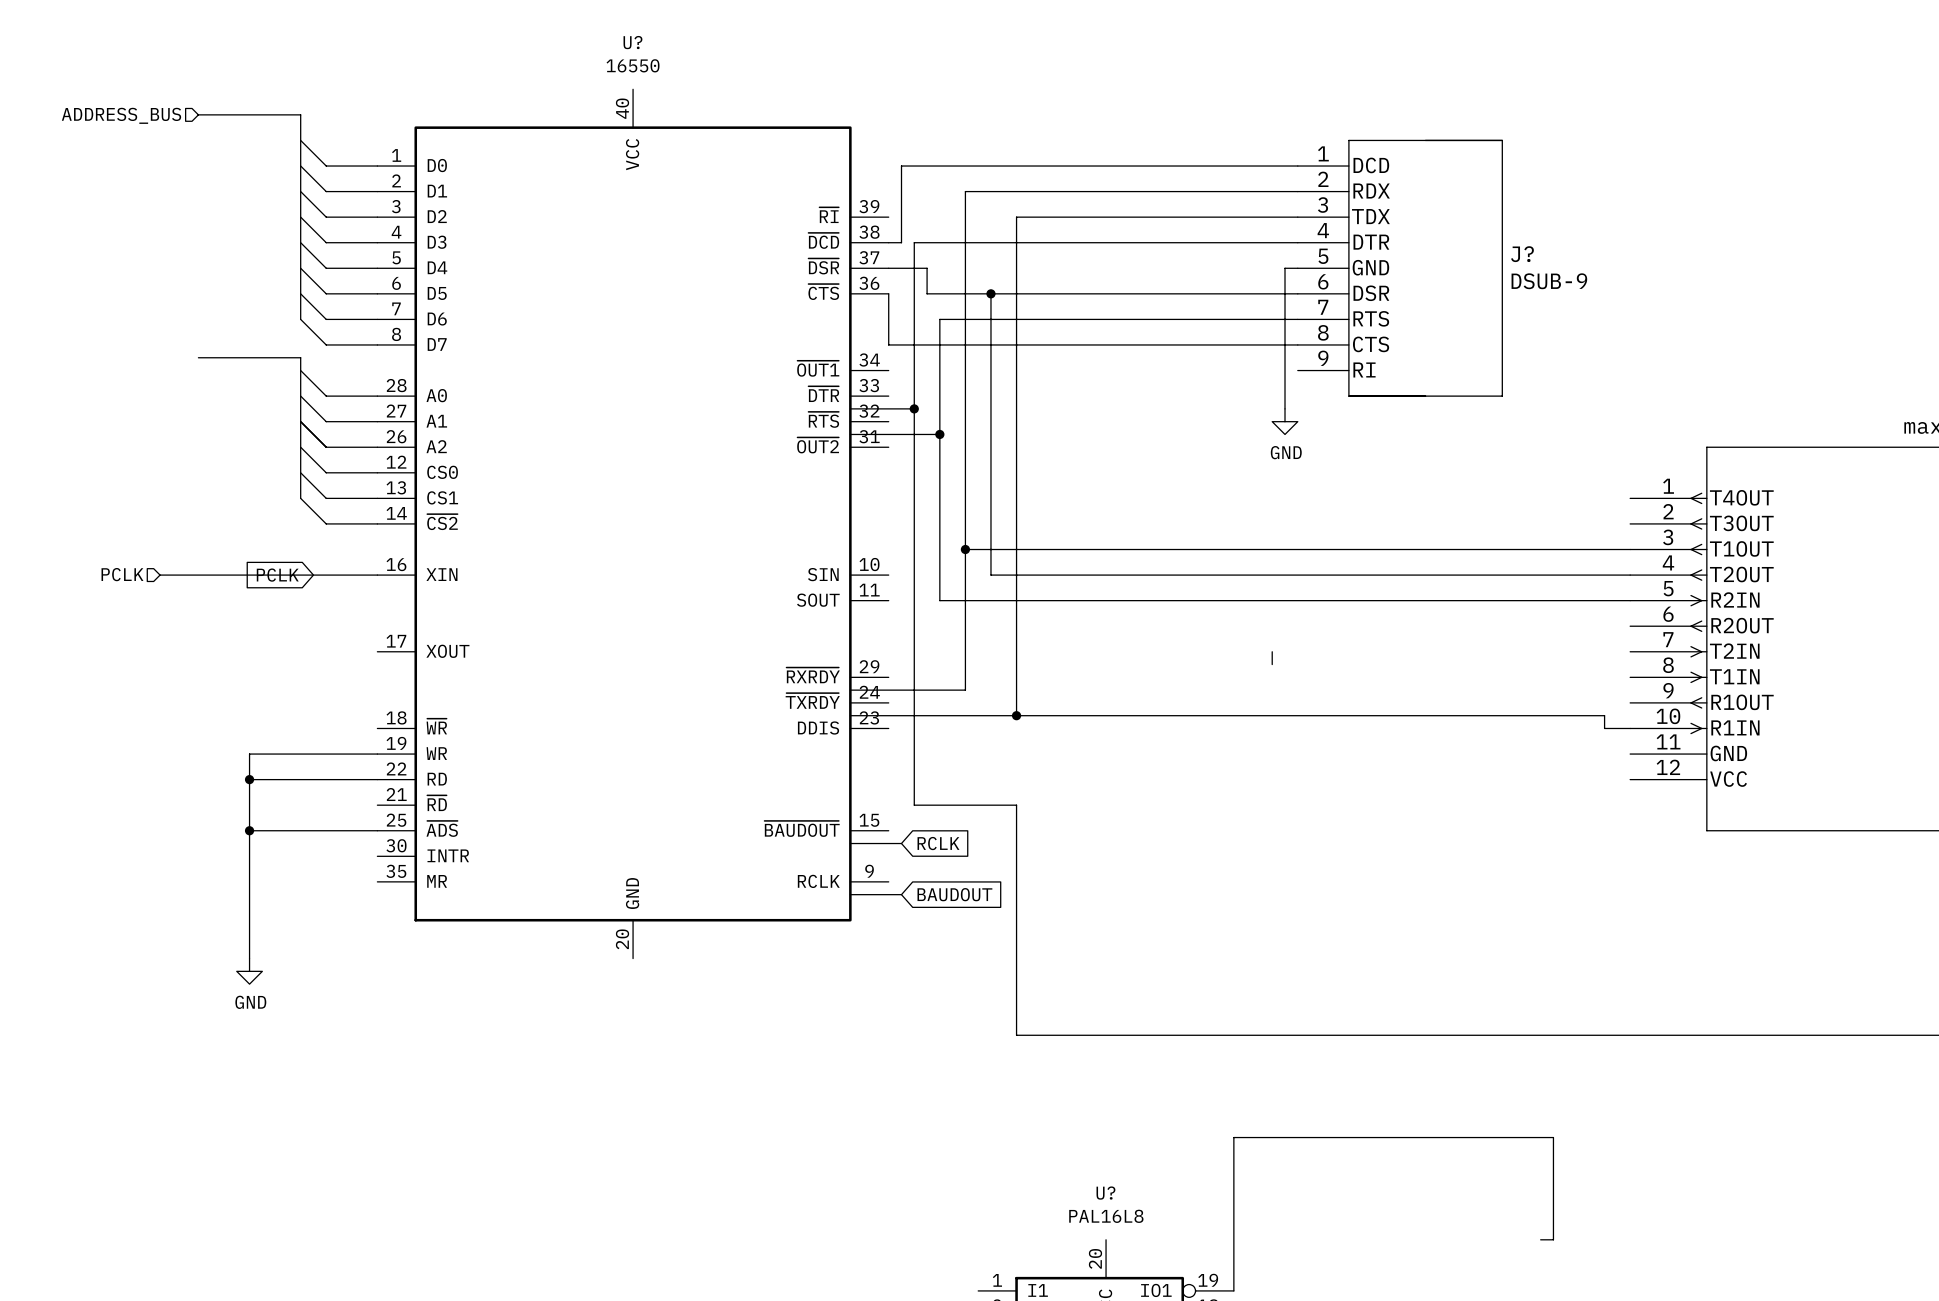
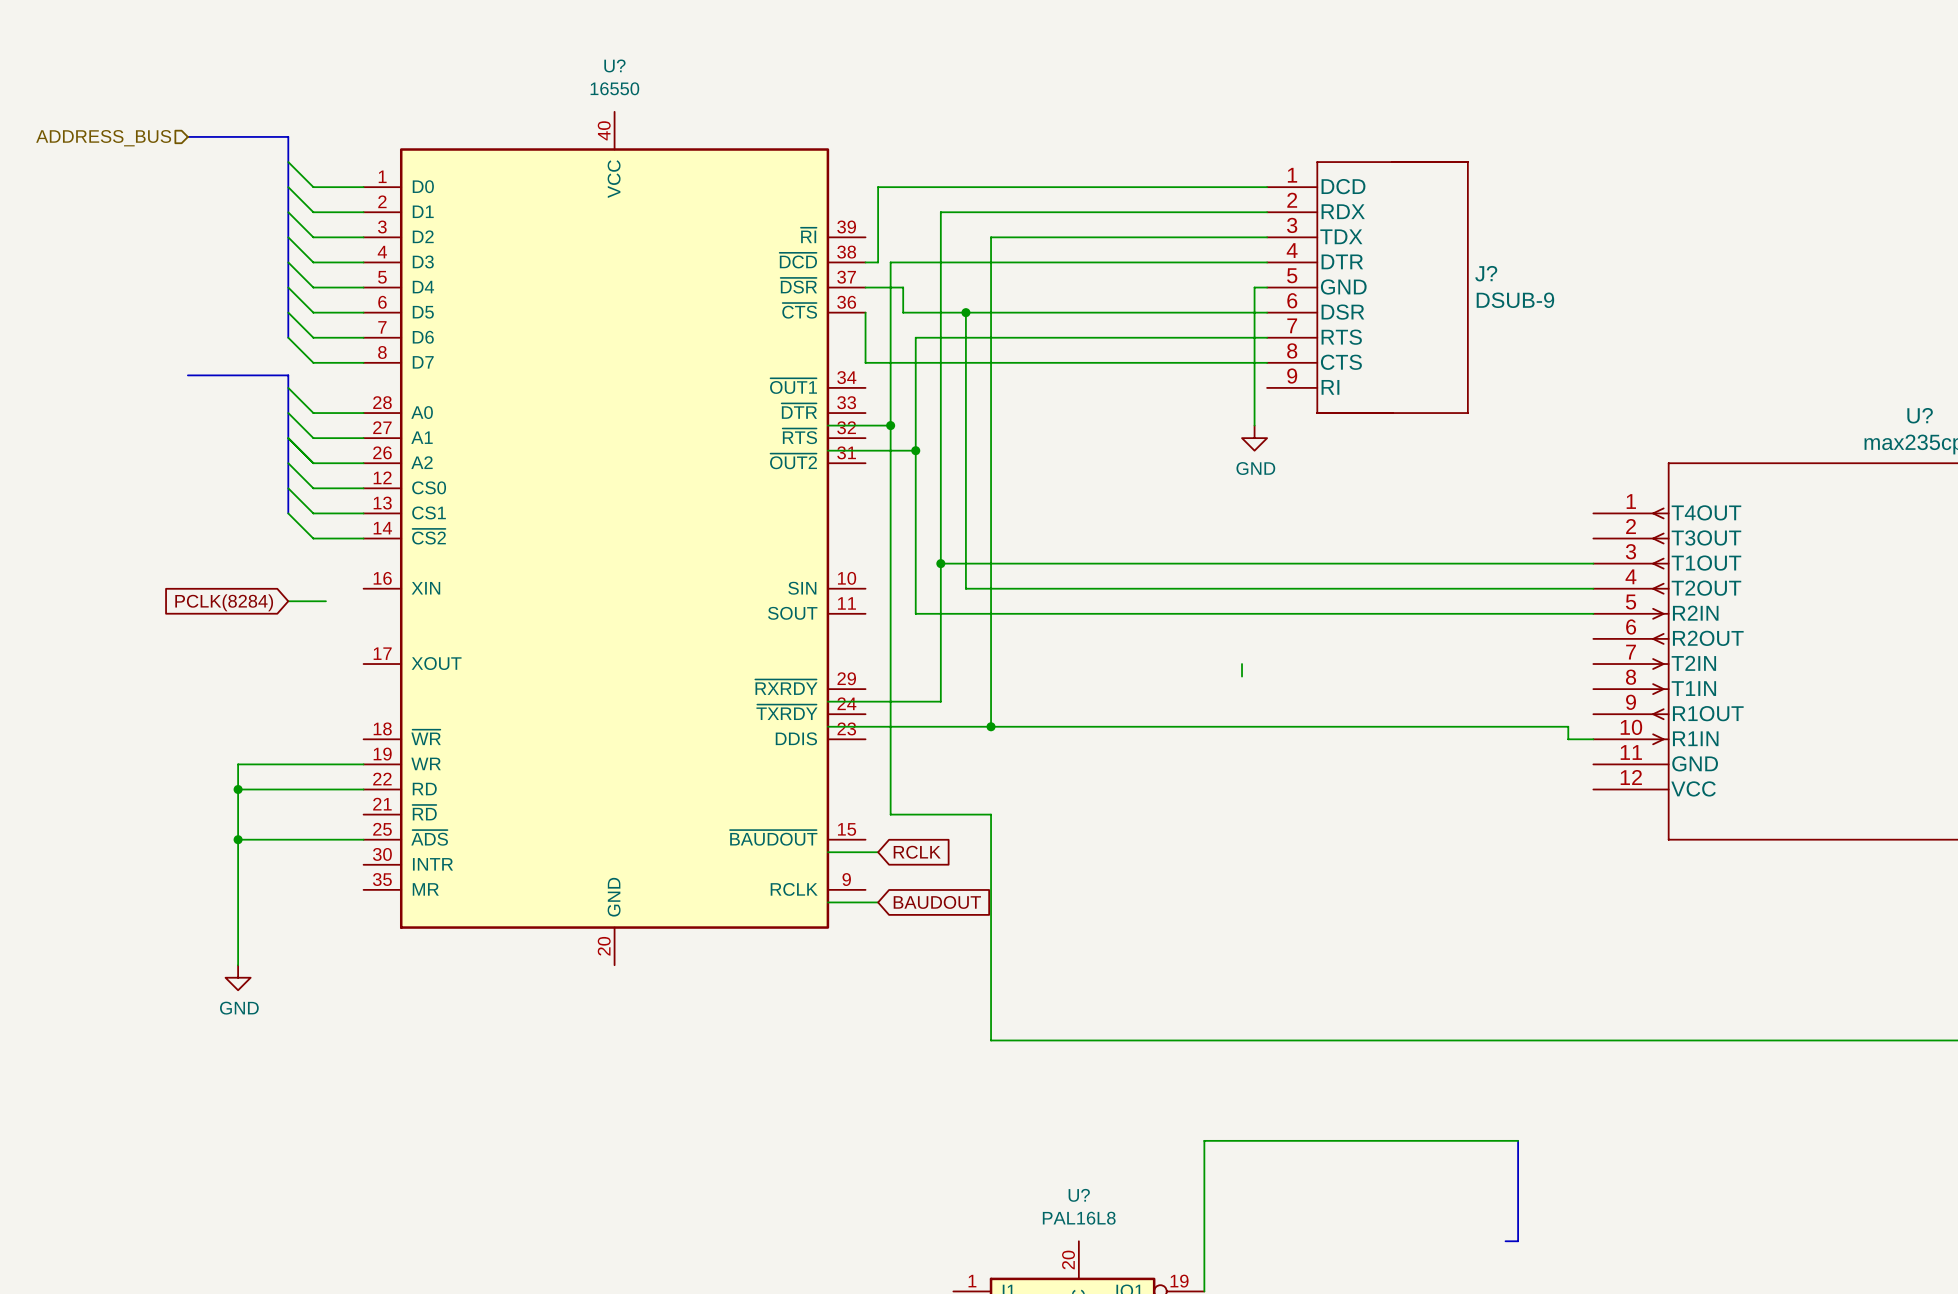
hierarchical label: PCLK (122, 574) -> none
wire: (160, 575) (377, 575) -> none
global label: PCLK (277, 575) -> none
wire: none -> (288, 601) (325, 601)
global label: none -> PCLK(8284) (224, 602)

